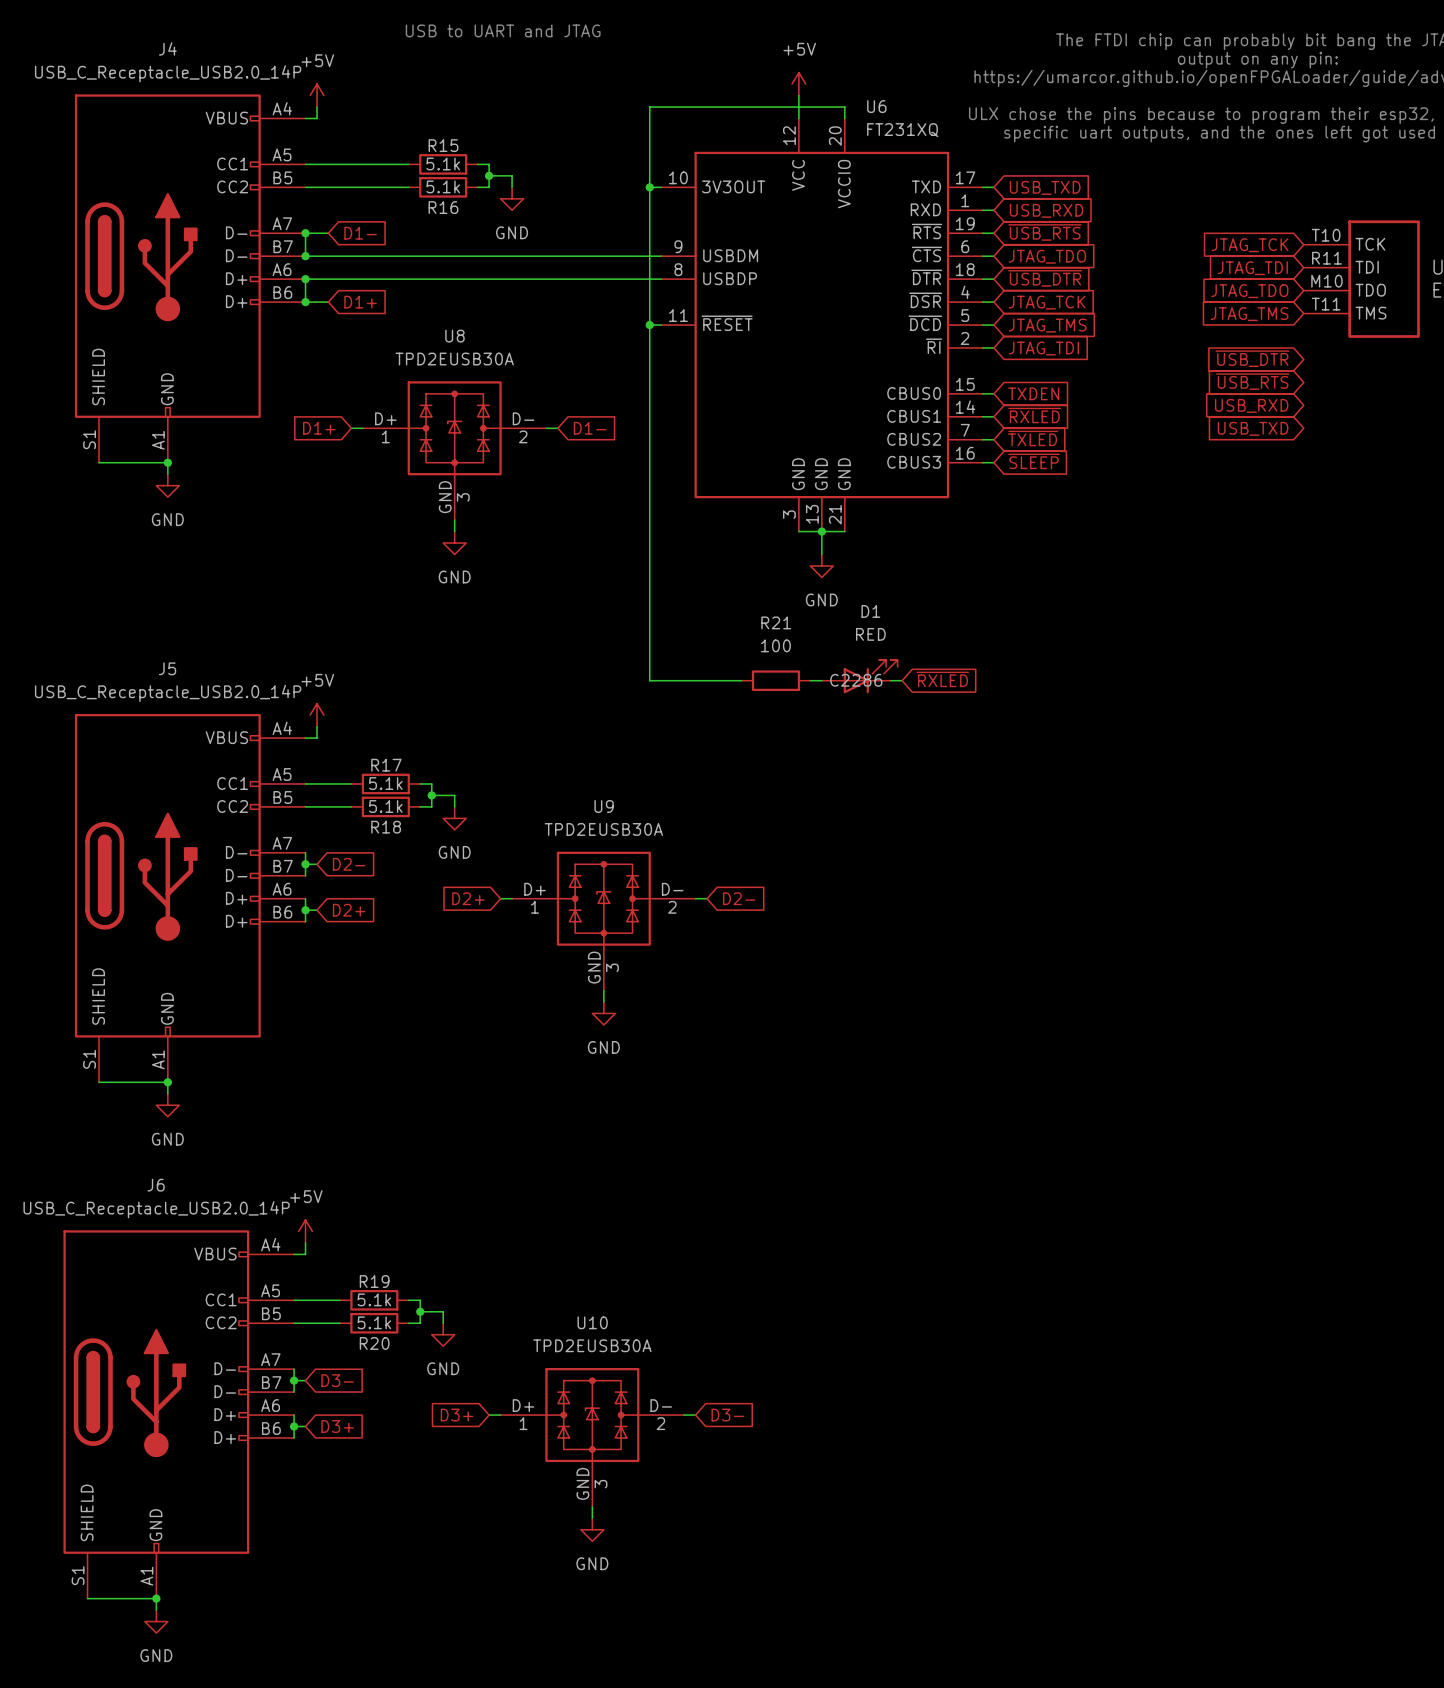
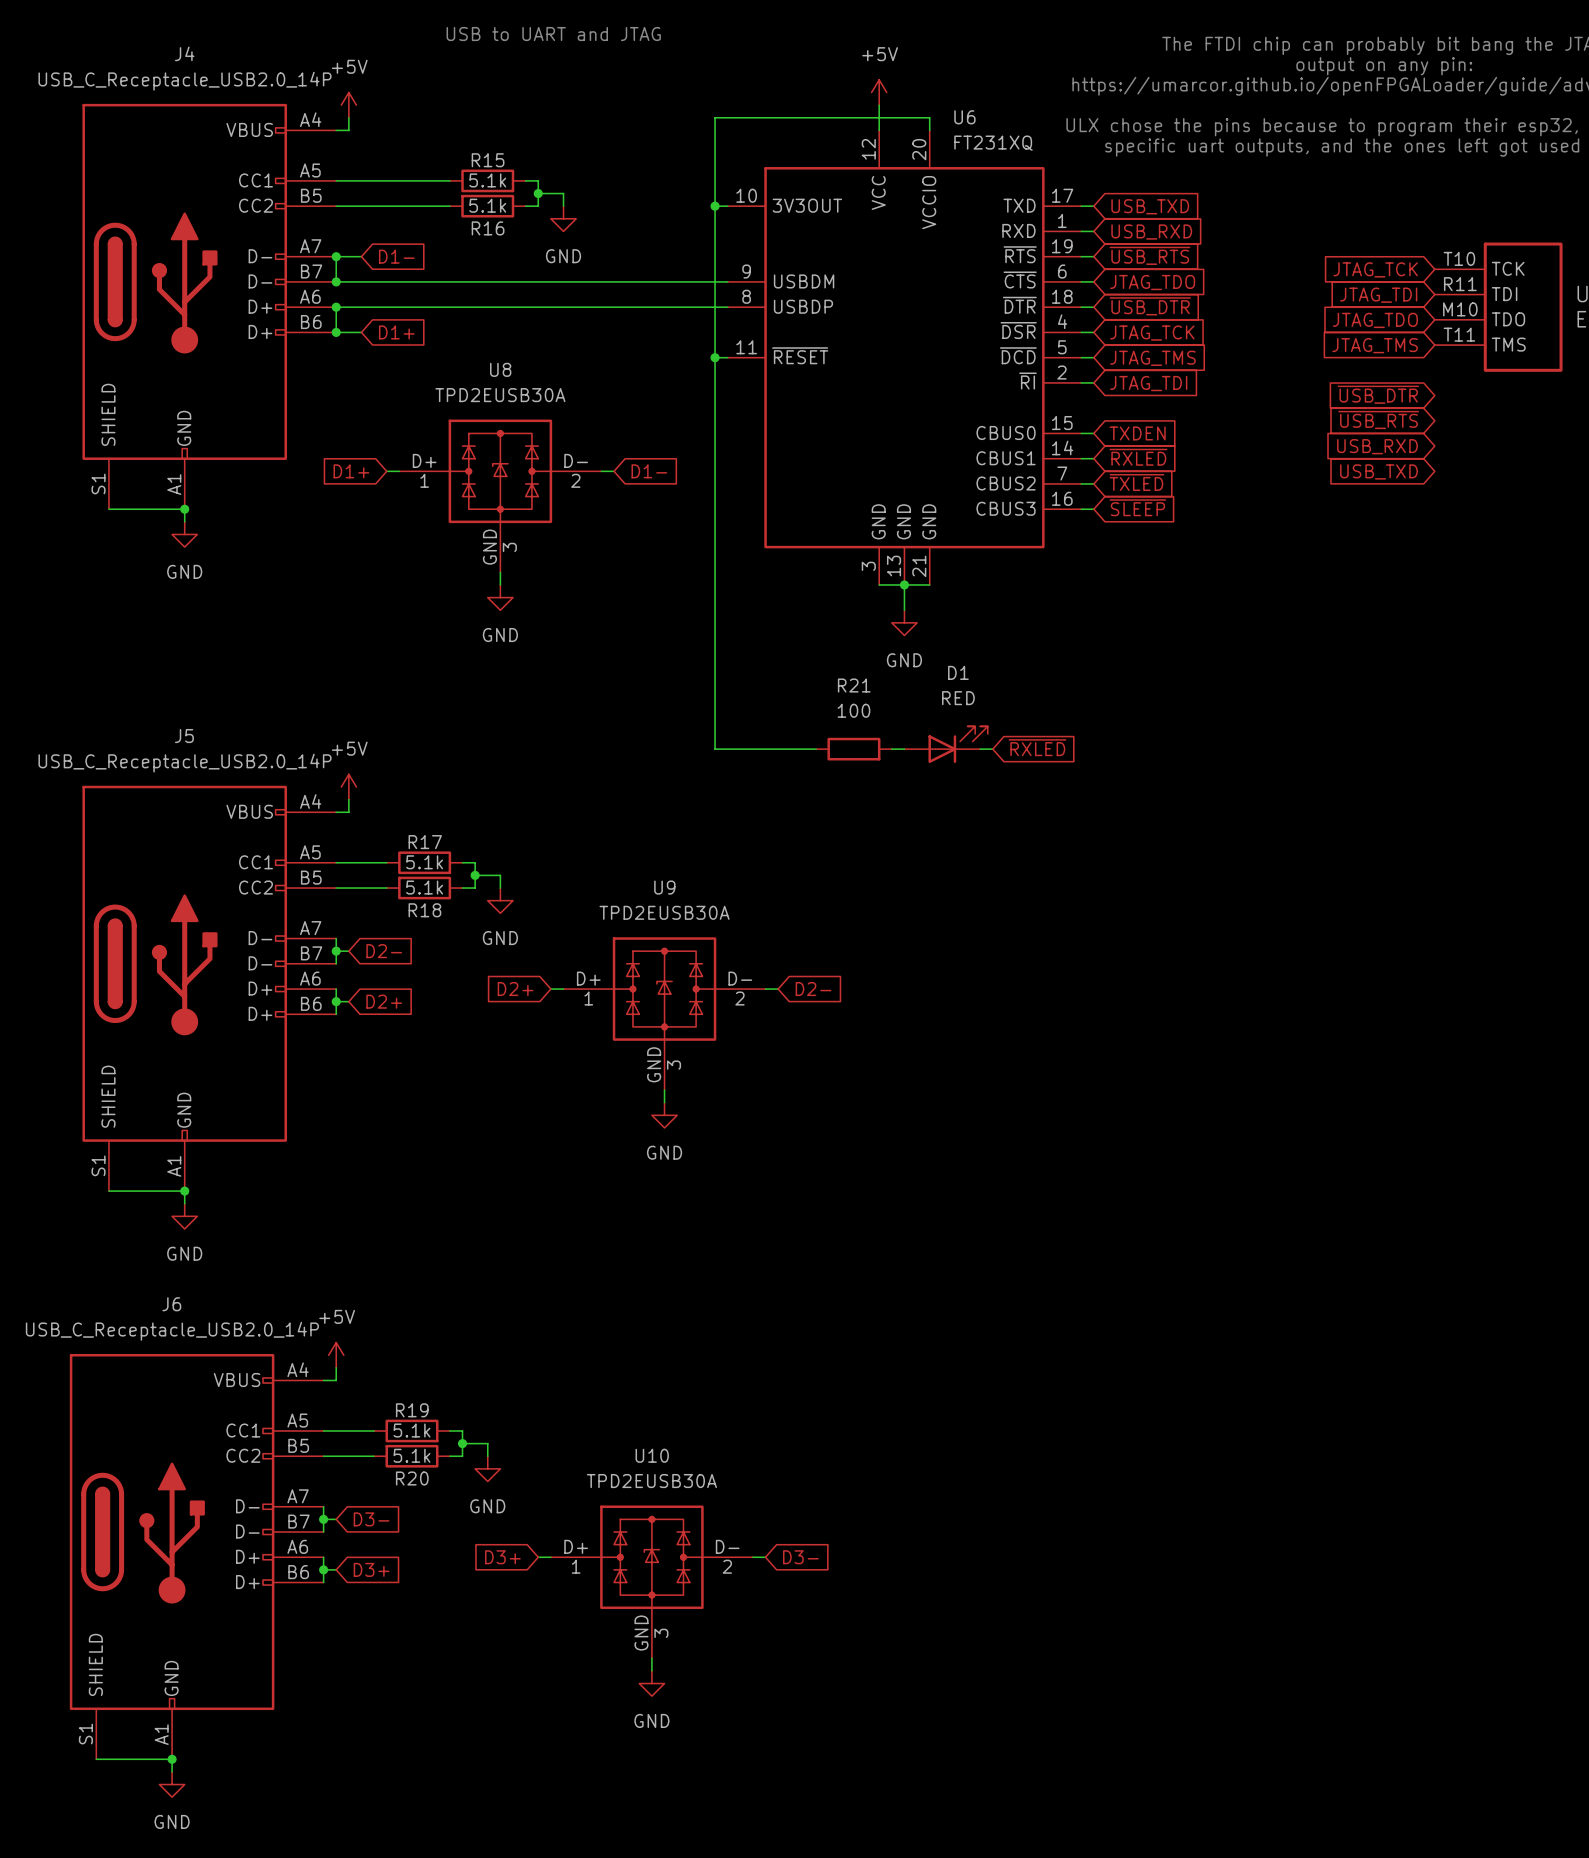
D1 text: C2286 (856, 680) -> none

